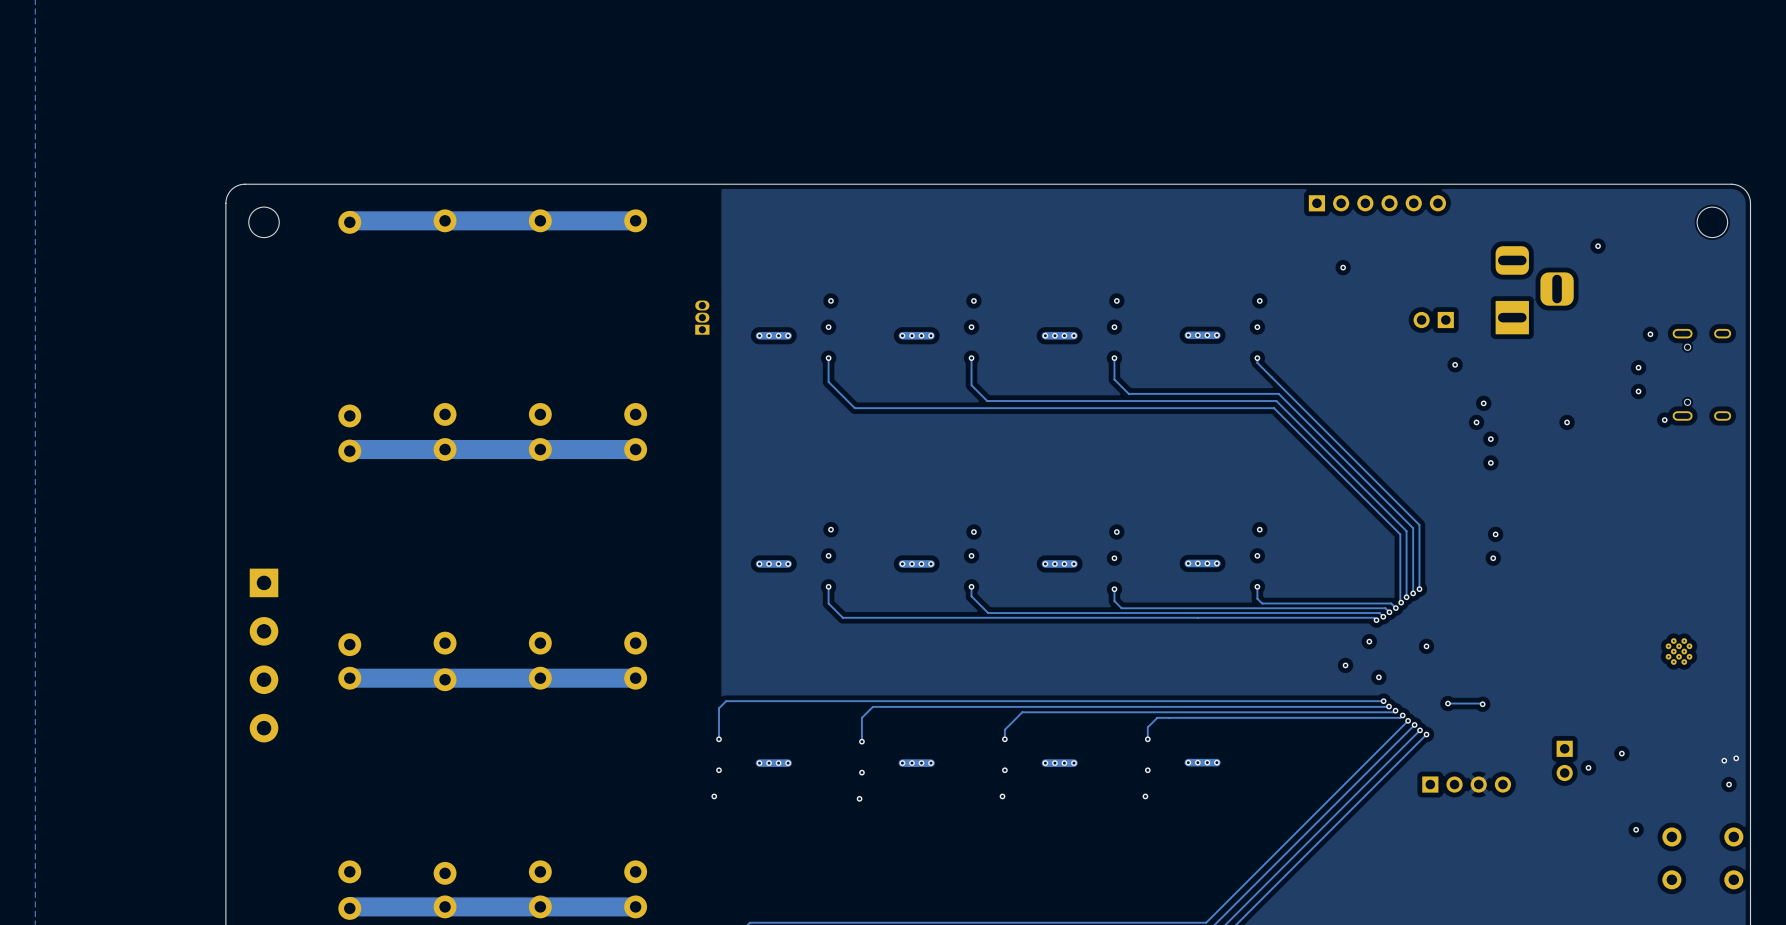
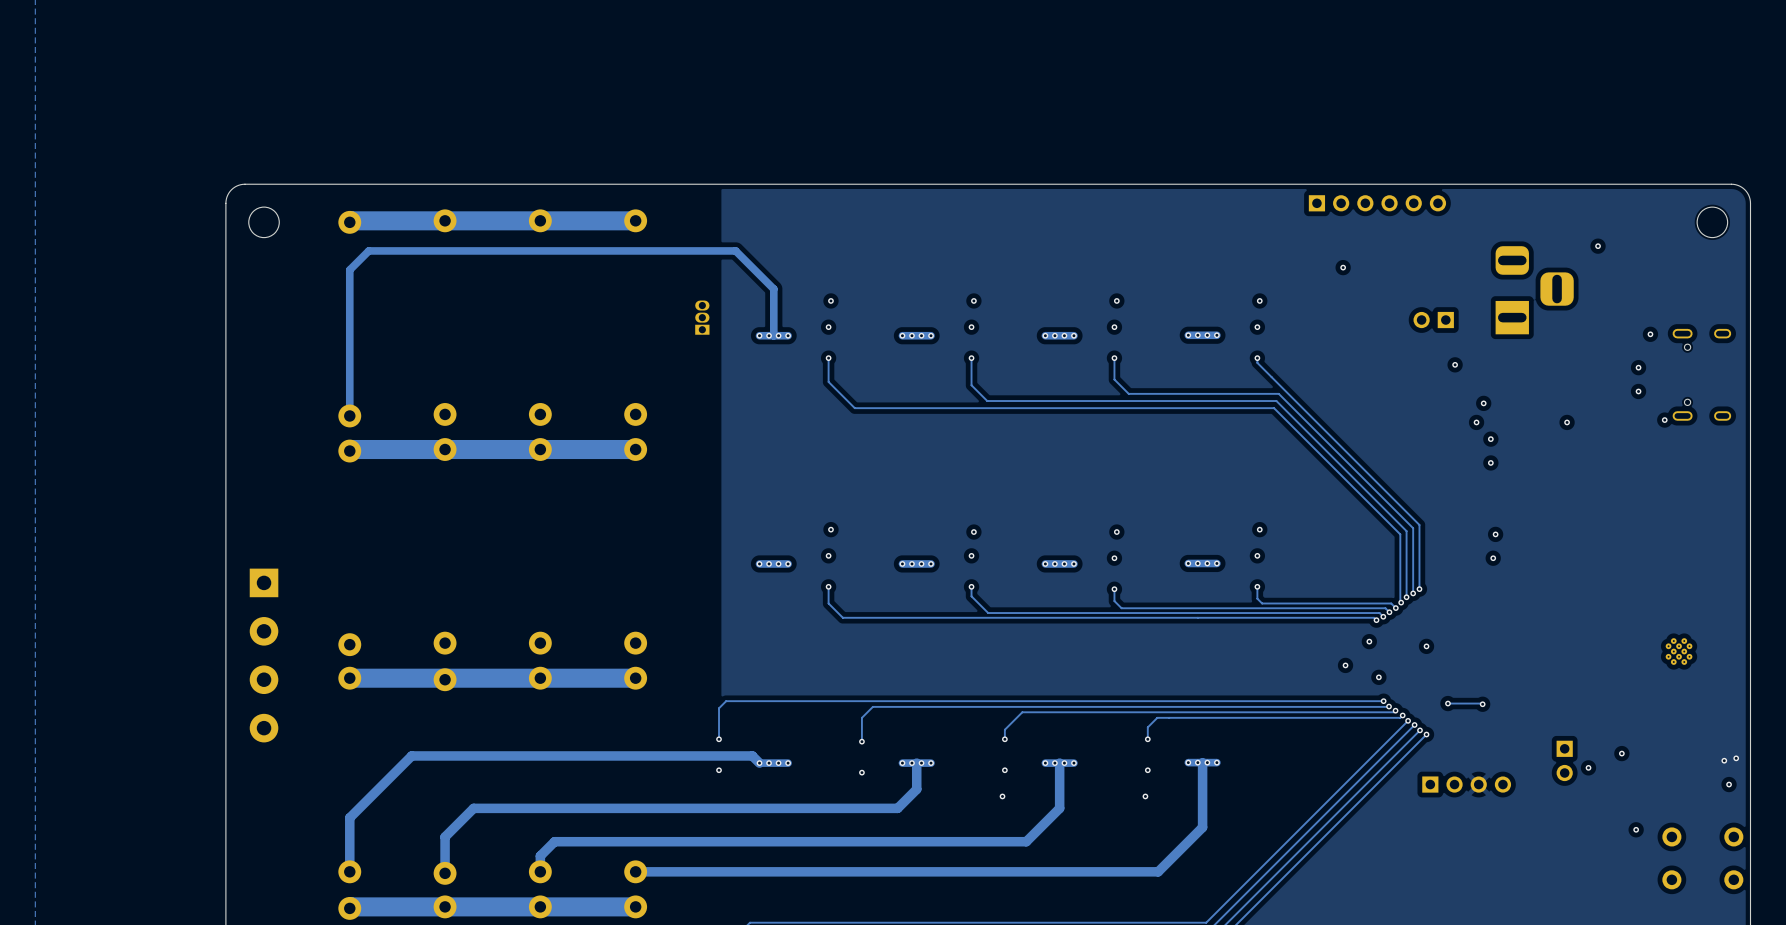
track: none -> (773, 335) (773, 289) (735, 250) (368, 250) (349, 269) (349, 415)
track: none -> (1202, 762) (1202, 827) (1158, 871) (635, 871)
track: none -> (759, 763) (752, 755) (411, 755) (349, 817) (349, 871)
track: none -> (916, 763) (916, 789) (897, 808) (473, 808) (445, 836) (445, 873)
track: none -> (1059, 763) (1059, 808) (1026, 841) (554, 841) (540, 856) (540, 871)
via: (714, 796) -> none
via: (859, 798) -> none

